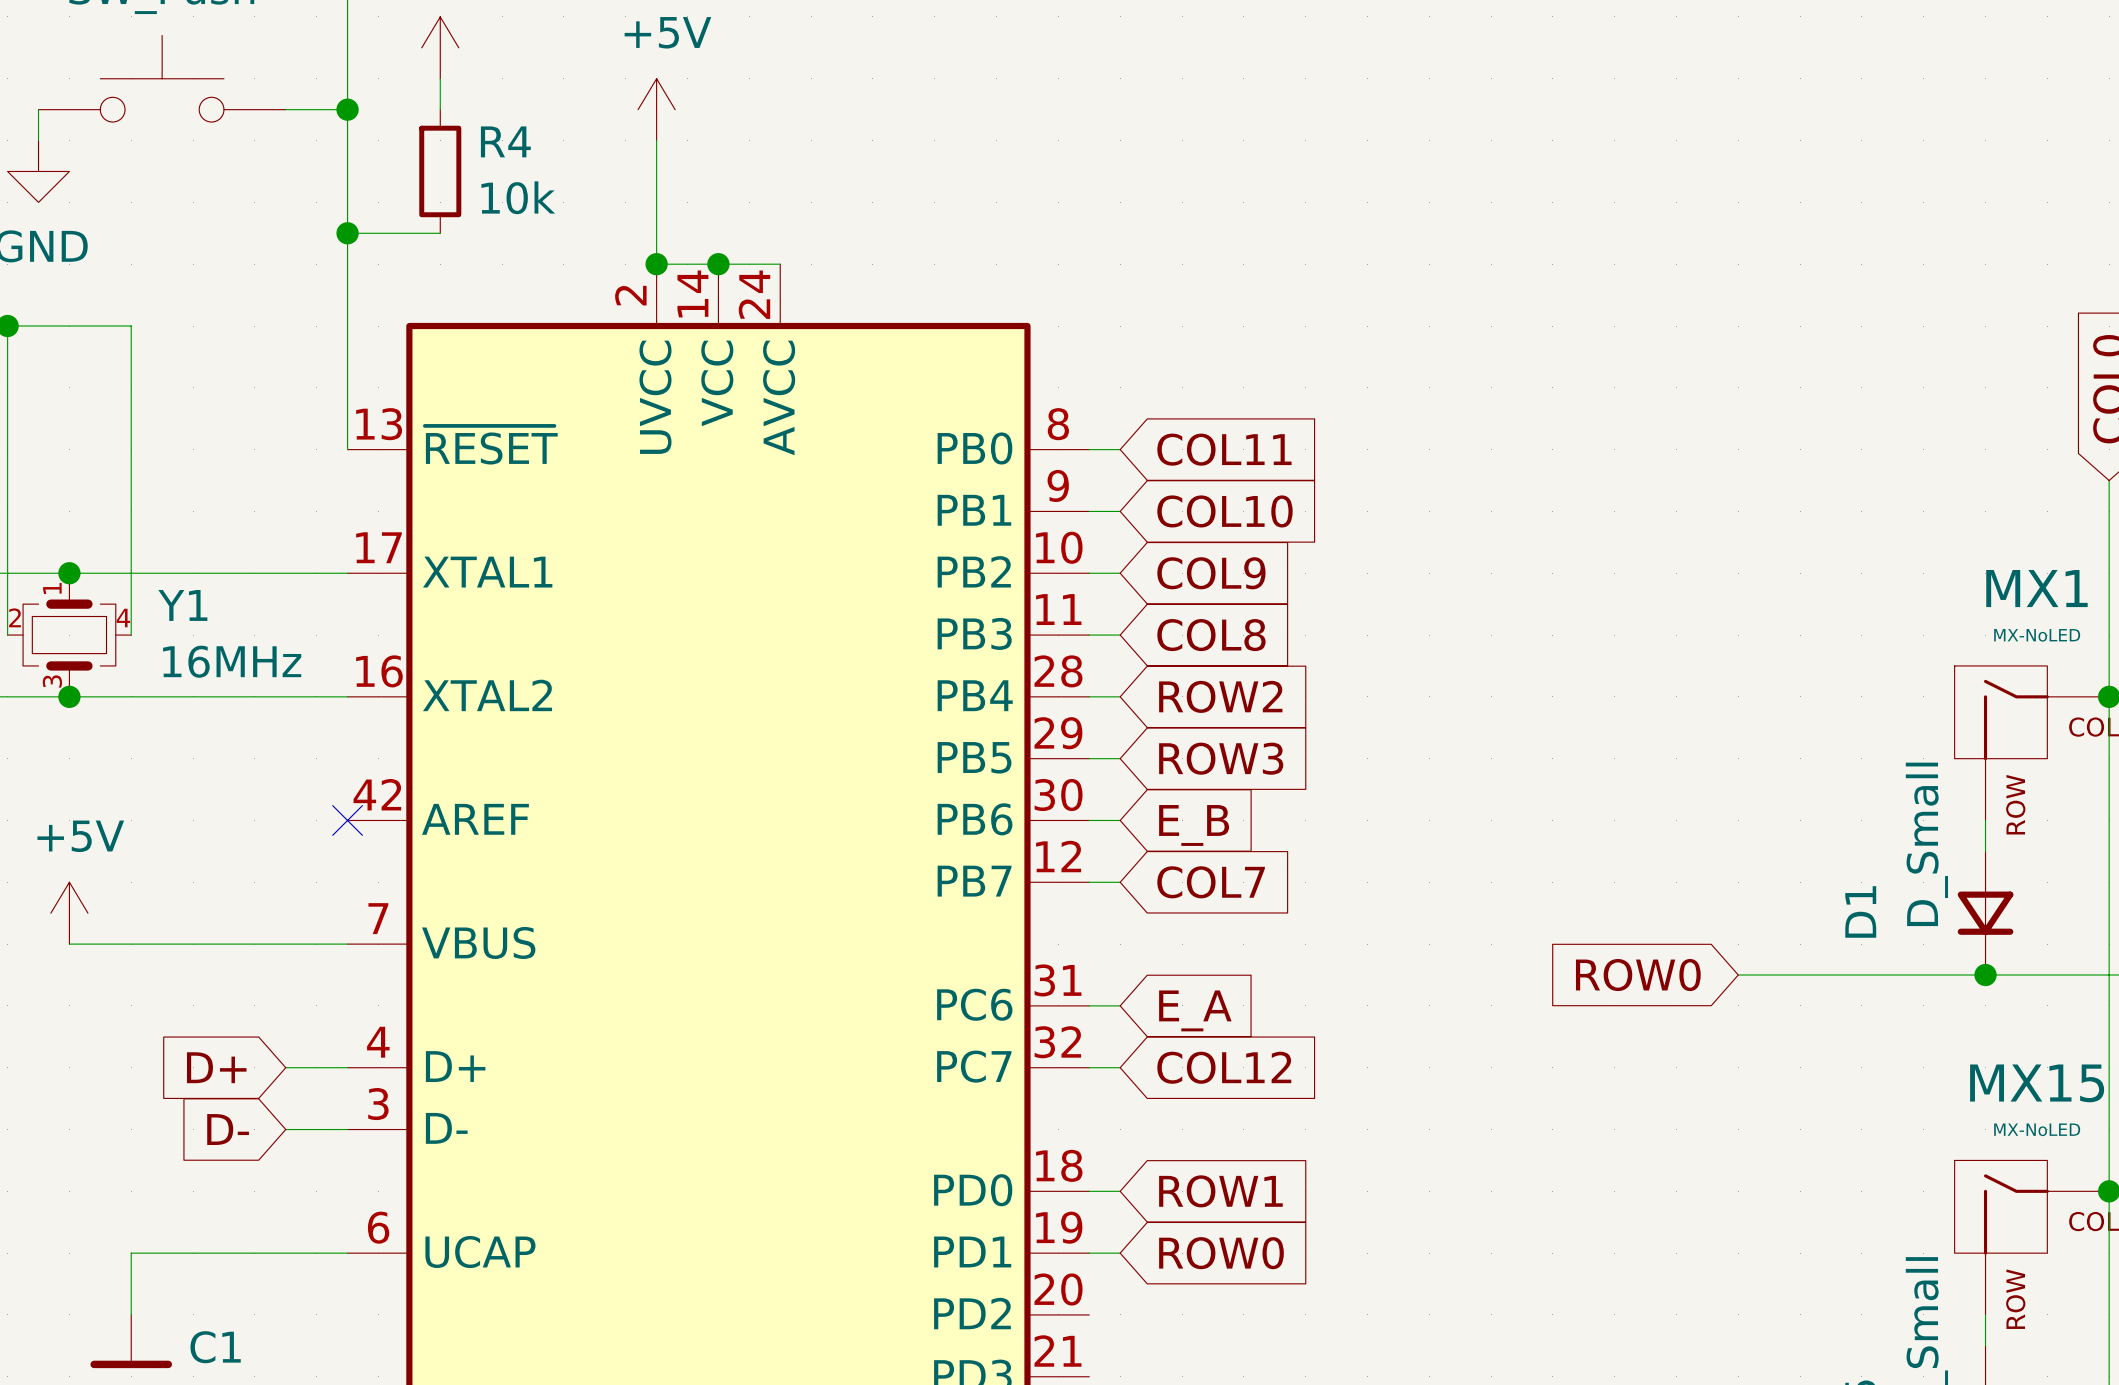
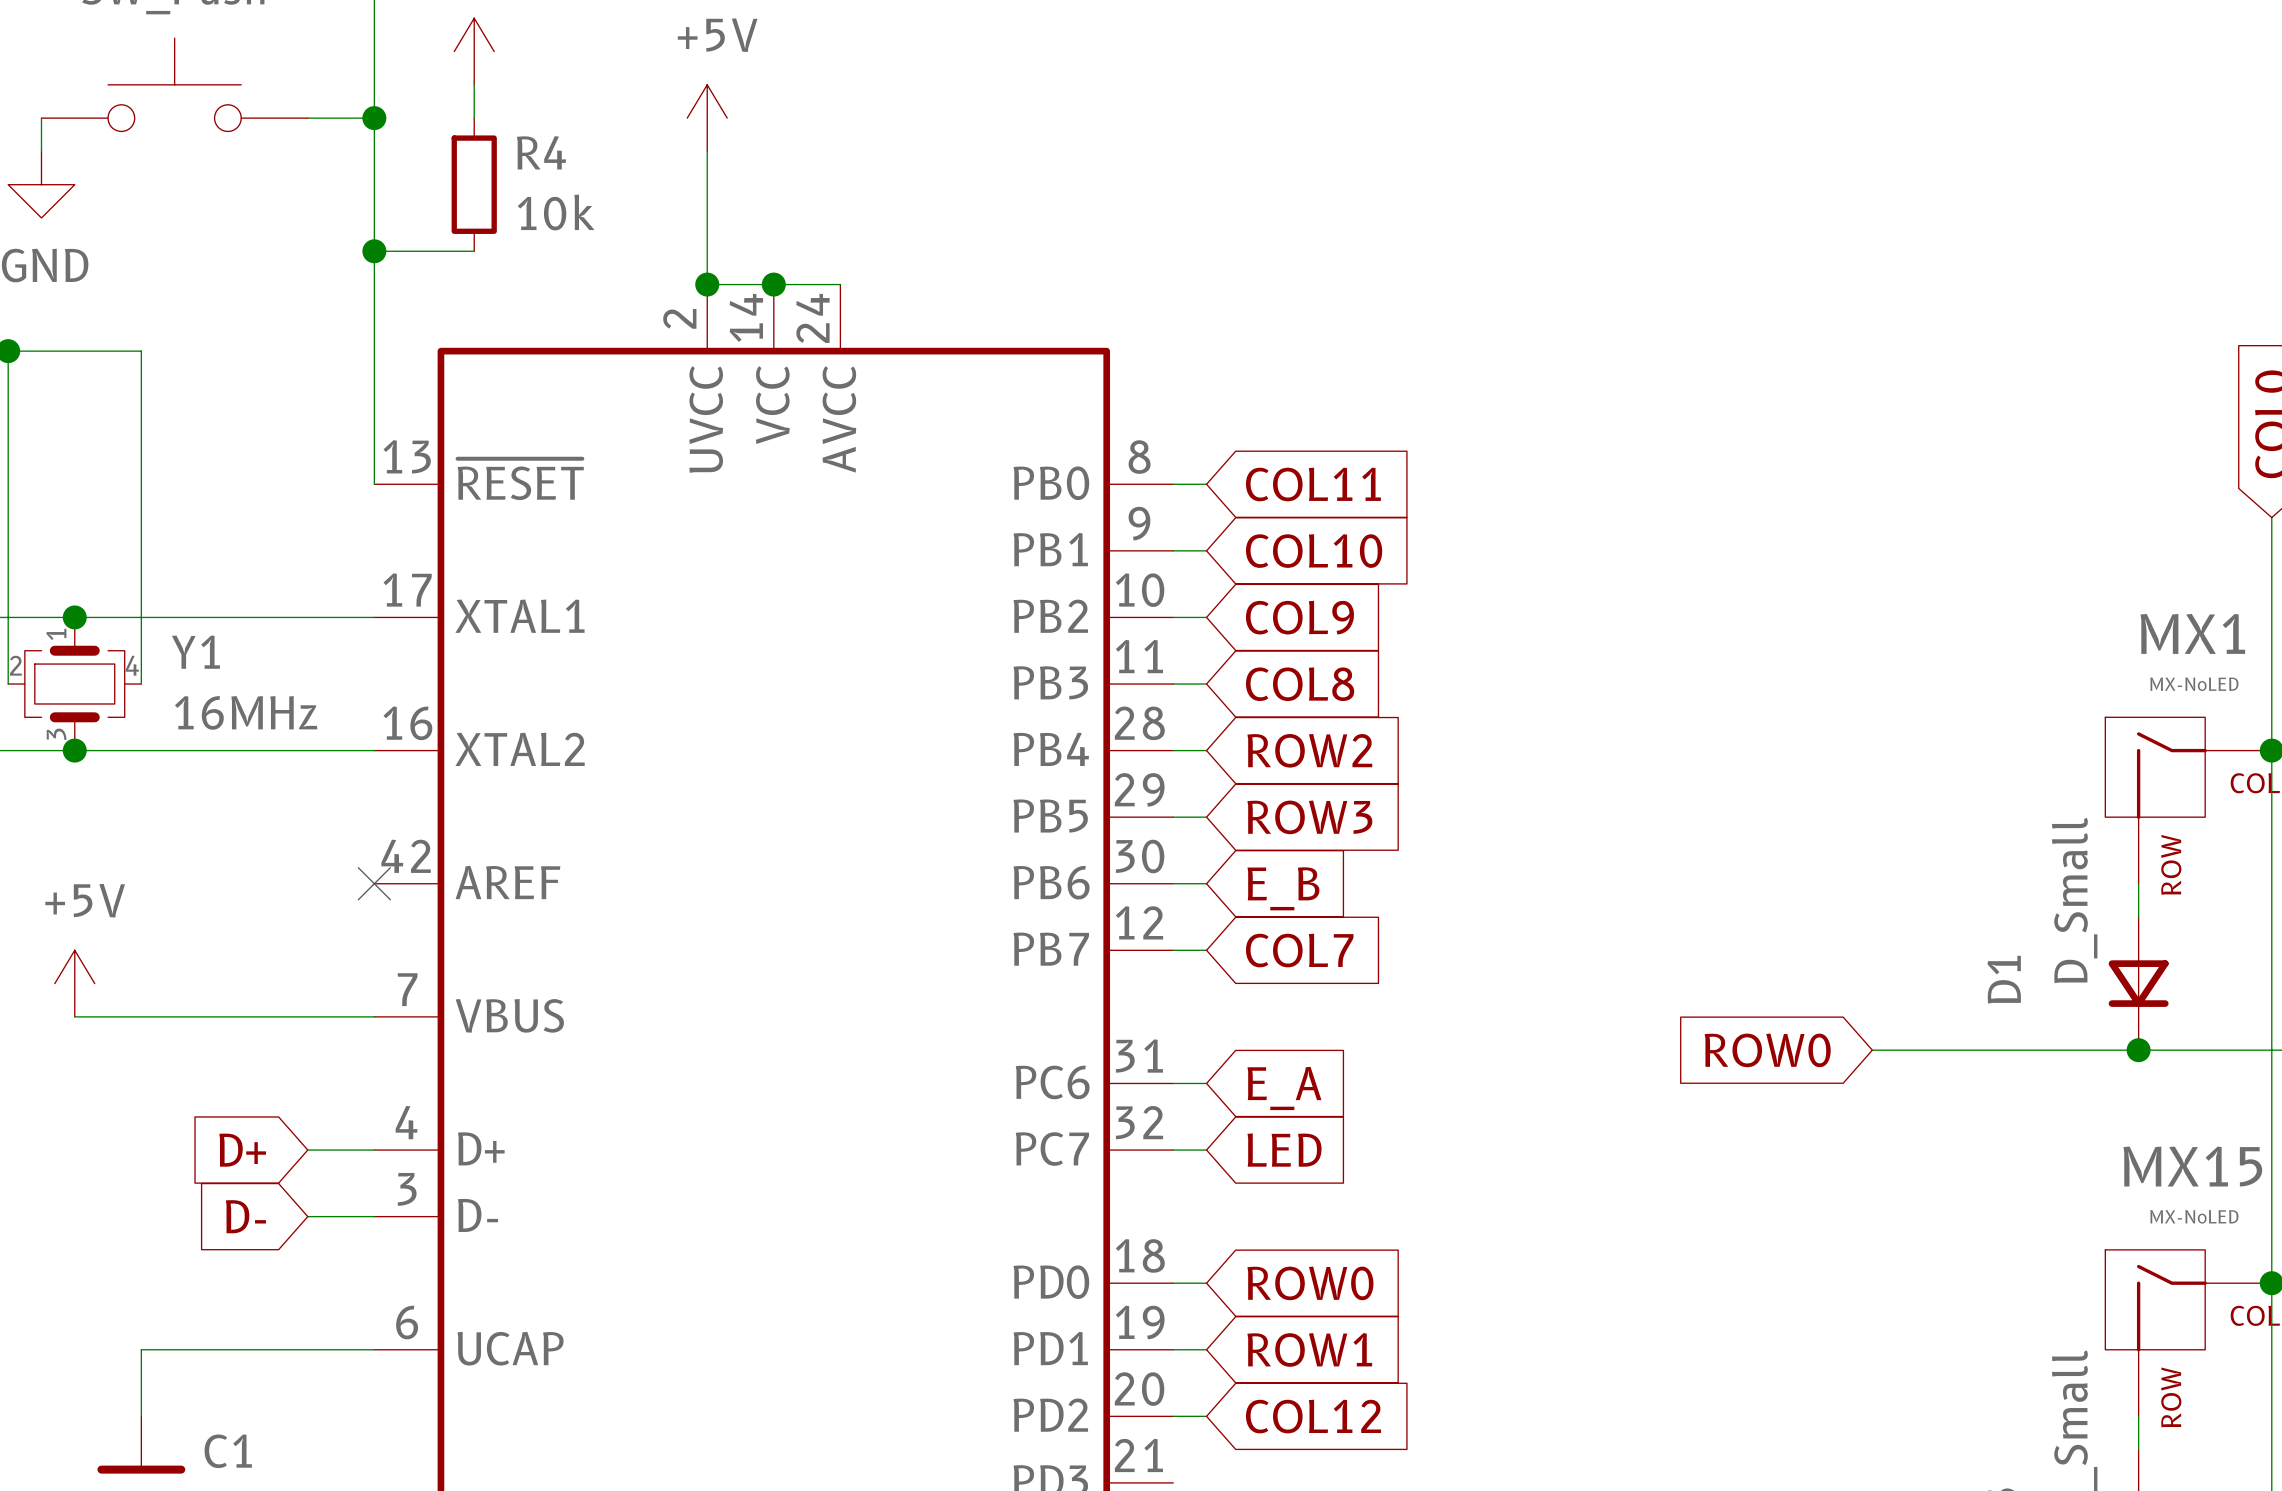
global label: COL12 (1224, 1067) -> LED (1284, 1150)
global label: ROW1 (1220, 1191) -> ROW0 (1310, 1283)
global label: ROW0 (1221, 1253) -> ROW1 (1309, 1349)
wire: none -> (1173, 1416) (1206, 1416)
global label: none -> COL12 (1313, 1416)

